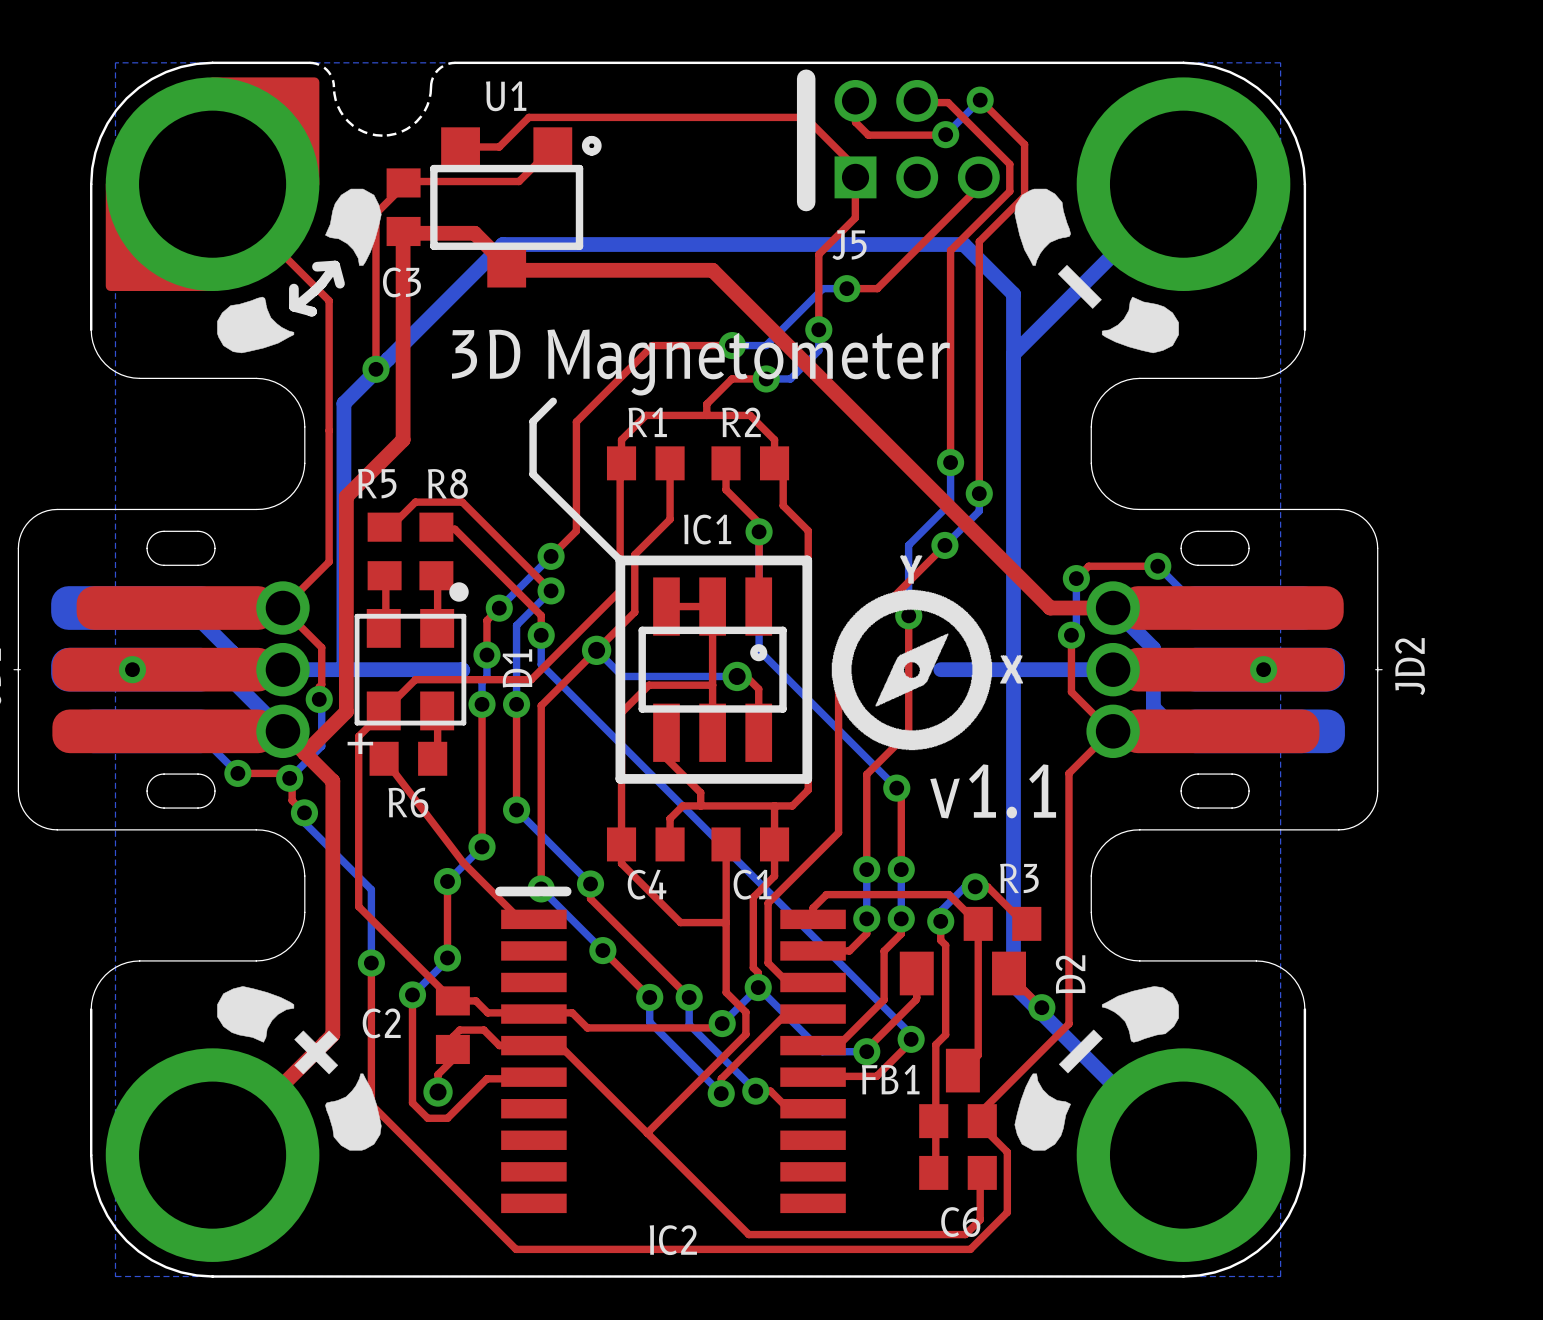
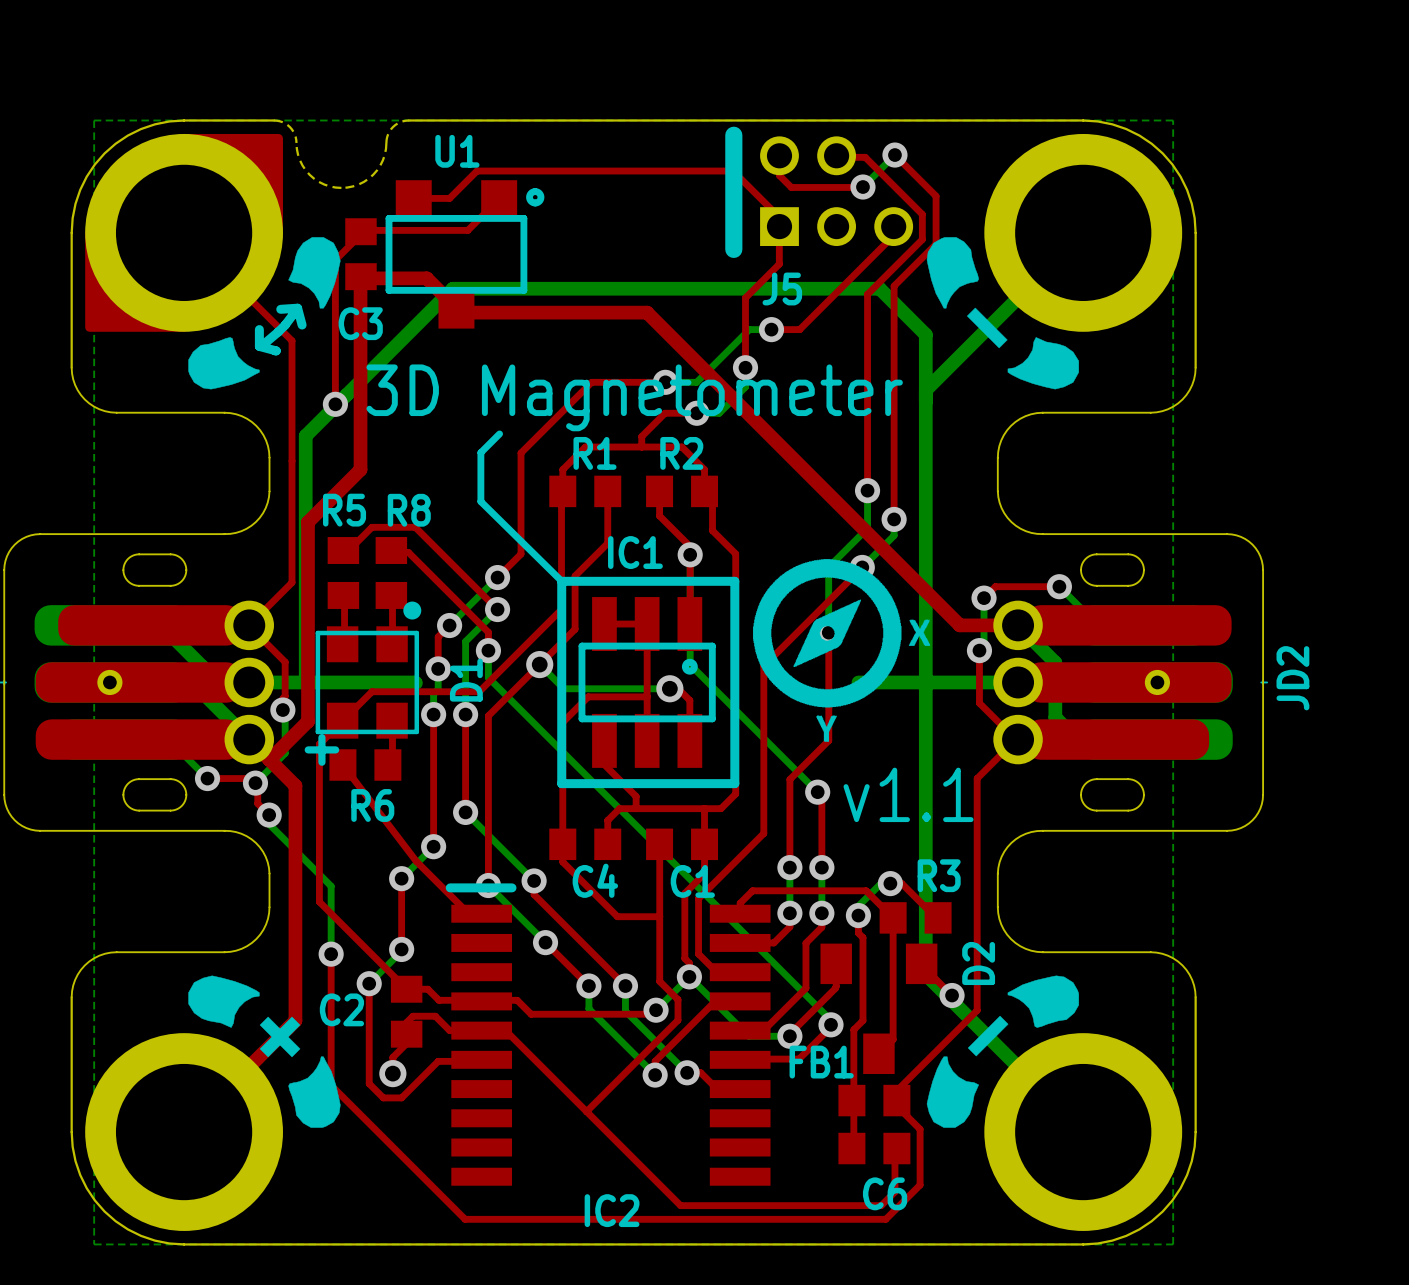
drawing shape: [831, 555, 1023, 751] -> [753, 559, 931, 742]

